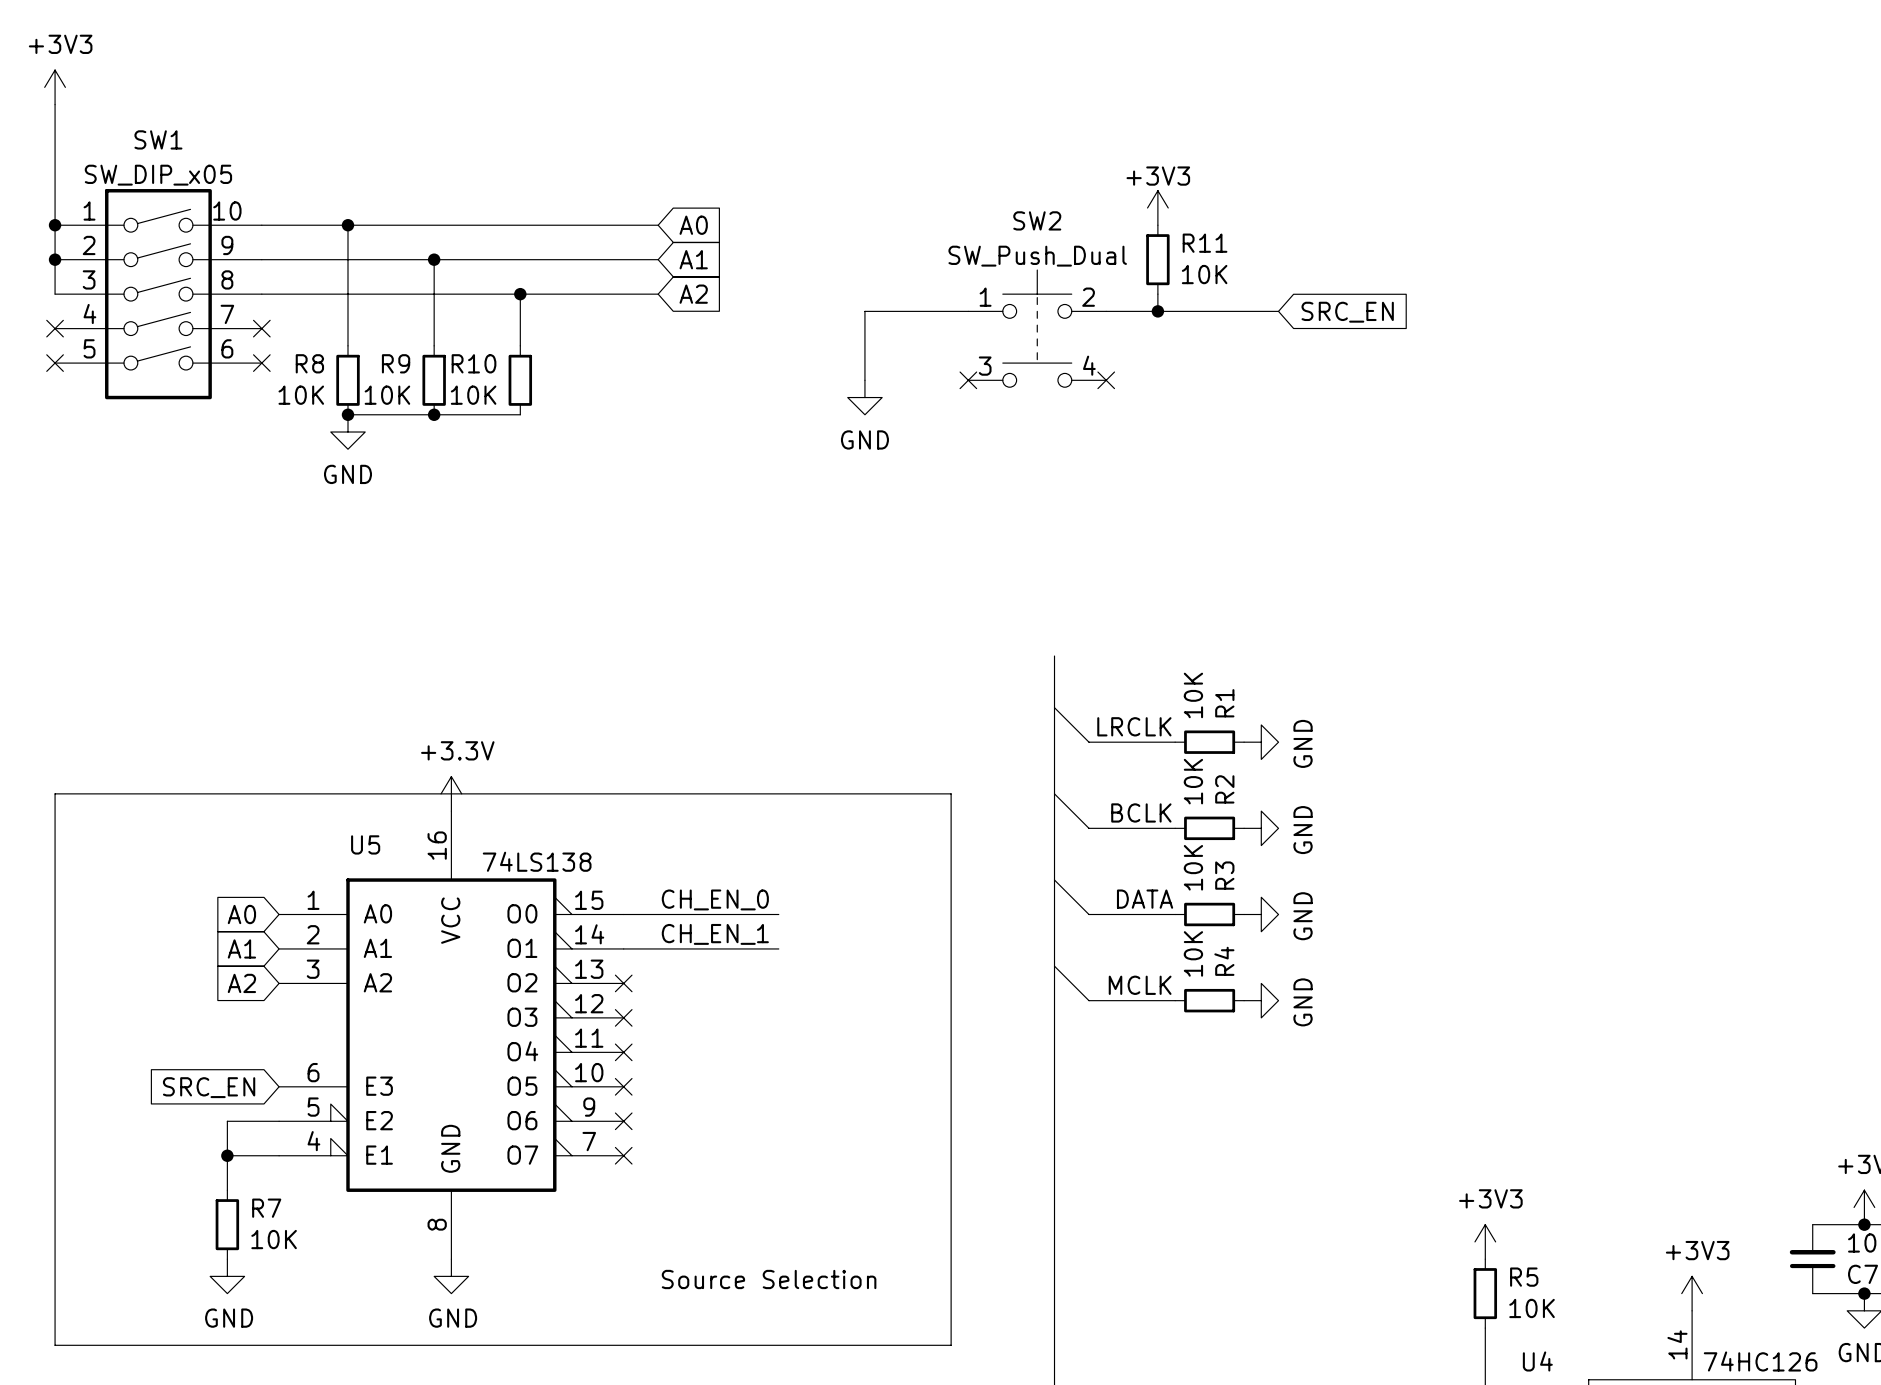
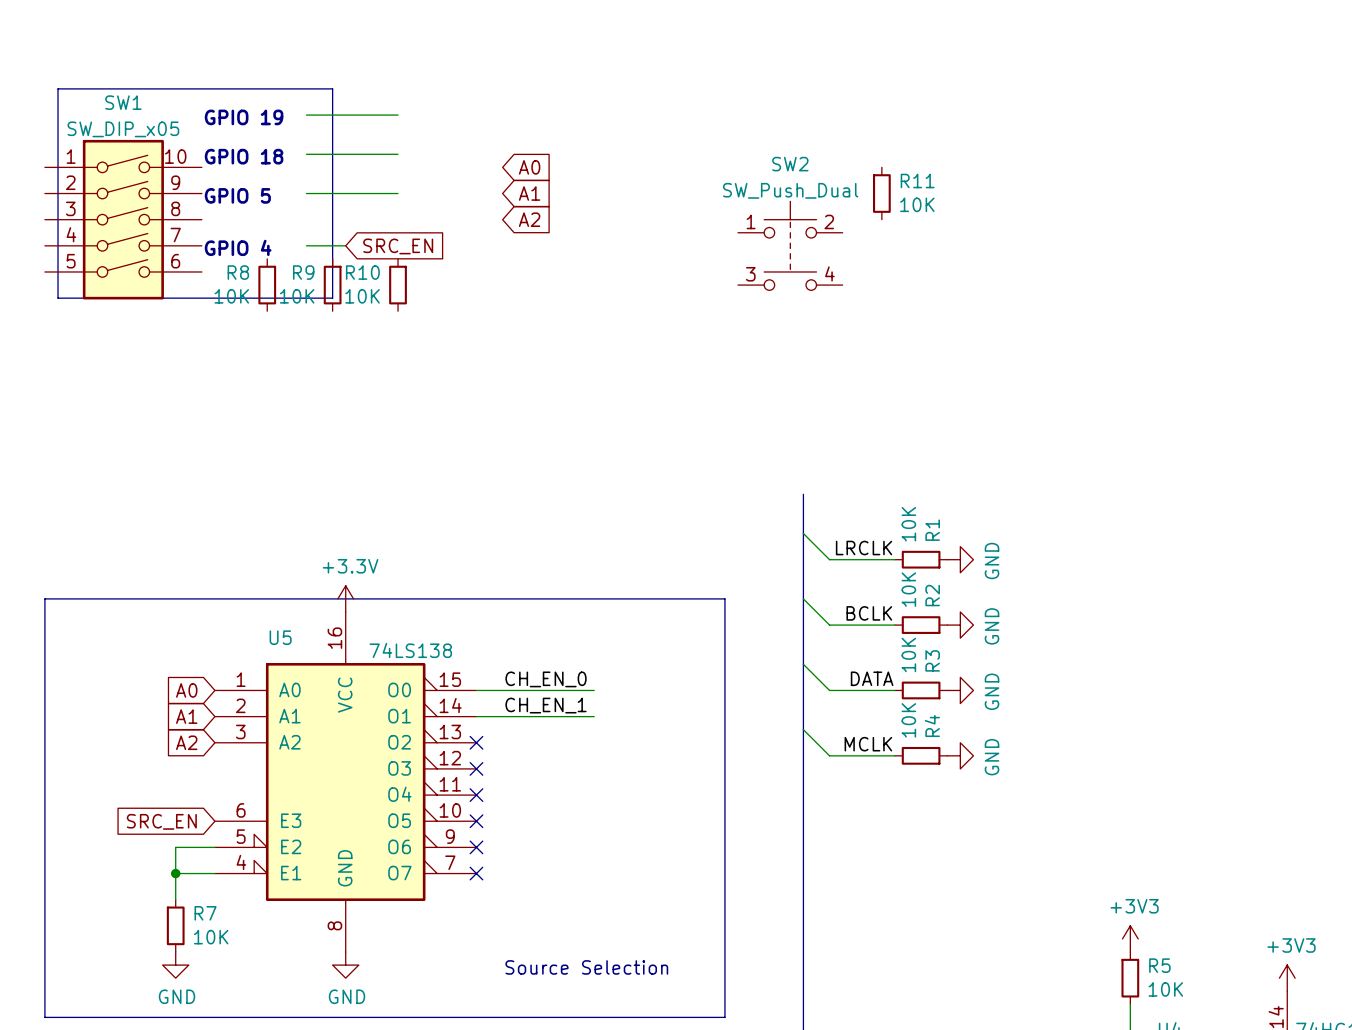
power symbol: +3V3 (55, 87) -> none
wire: (55, 104) (55, 294) -> none
line: none -> (58, 88) (58, 298) (332, 298) (332, 88) (58, 88)
wire: none -> (306, 115) (398, 115)
text: none -> GPIO 19 (244, 117)
wire: none -> (306, 154) (398, 154)
power symbol: +3V3 (1157, 207) -> none
text: none -> GPIO 18 (244, 156)
junction: (55, 225) -> none
wire: (261, 225) (658, 225) -> none
wire: (347, 225) (347, 345) -> none
junction: (347, 225) -> none
junction: (55, 259) -> none
wire: (261, 259) (399, 259) -> none
junction: (434, 259) -> none
wire: (520, 259) (658, 259) -> none
text: none -> GPIO 5 (237, 195)
wire: (261, 294) (658, 294) -> none
wire: (520, 294) (520, 345) -> none
junction: (520, 294) -> none
wire: (1157, 294) (1157, 311) -> none
wire: (968, 311) (864, 311) (864, 380) -> none
wire: (1106, 311) (1278, 311) -> none
junction: (1157, 311) -> none
global label: SRC_EN (1347, 312) -> none
no-connect mark: (55, 328) -> none
no-connect mark: (261, 328) -> none
wire: none -> (306, 245) (345, 245)
global label: none -> SRC_EN (398, 246)
text: none -> GPIO 4 (238, 247)
no-connect mark: (55, 363) -> none
no-connect mark: (261, 363) -> none
no-connect mark: (968, 380) -> none
no-connect mark: (1106, 380) -> none
power symbol: GND (864, 397) -> none
wire: (347, 414) (520, 414) -> none
junction: (347, 414) -> none
junction: (434, 414) -> none
power symbol: GND (347, 432) -> none

